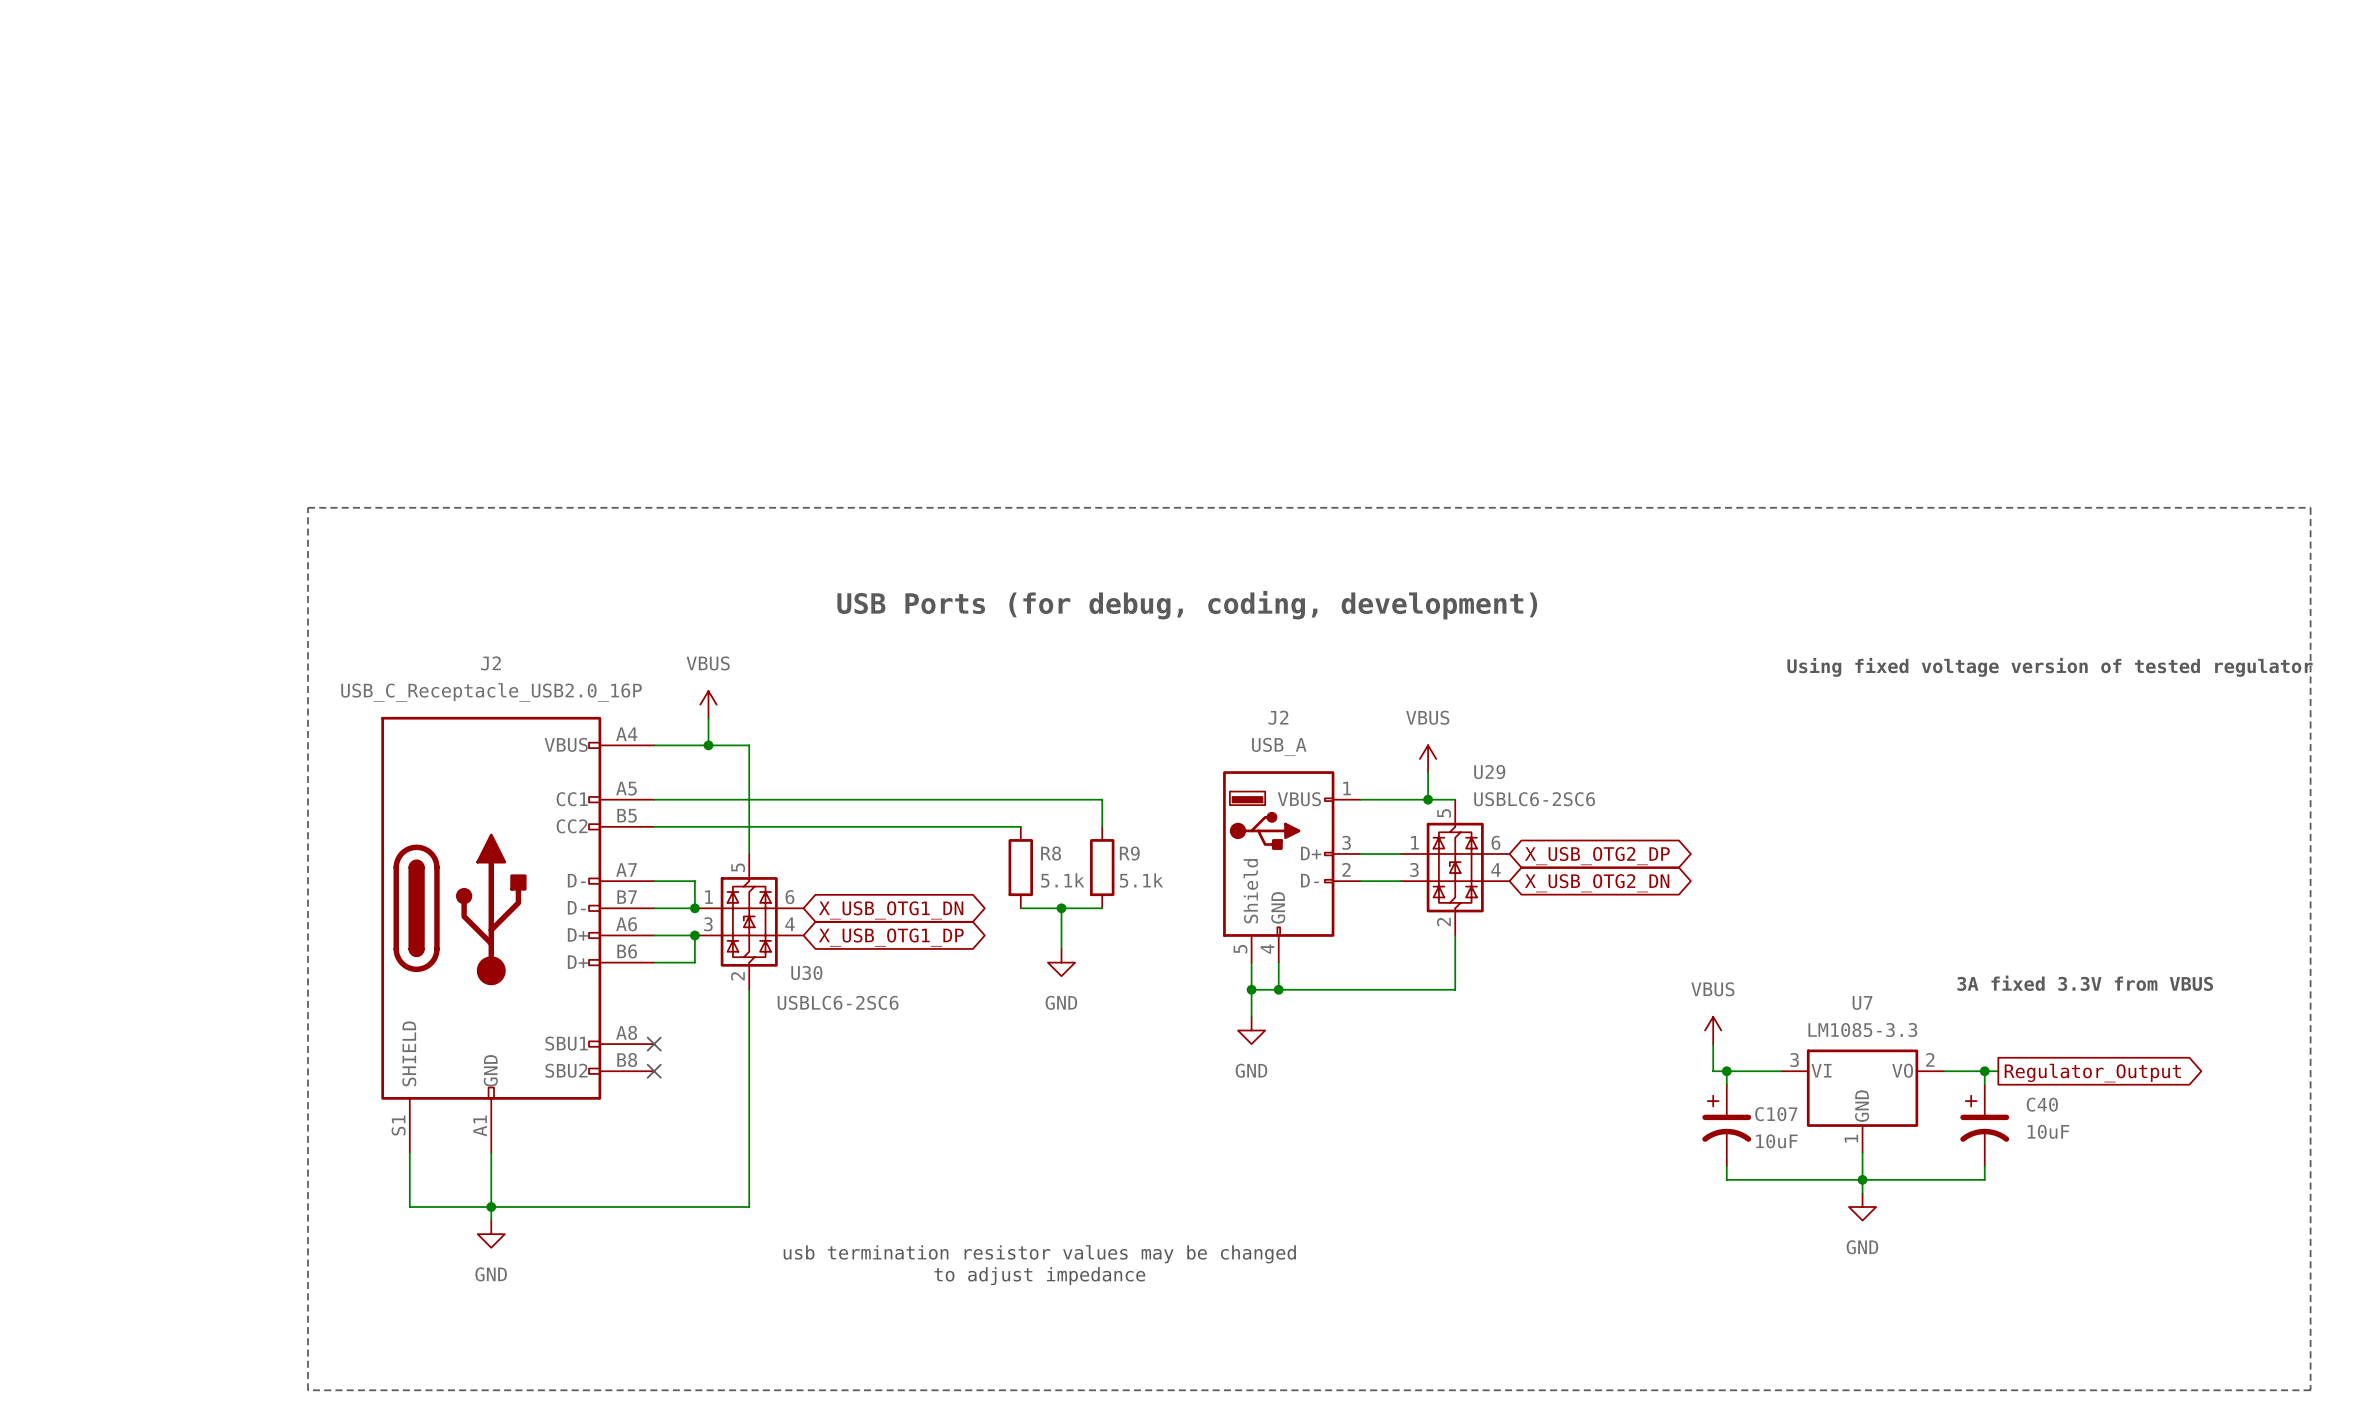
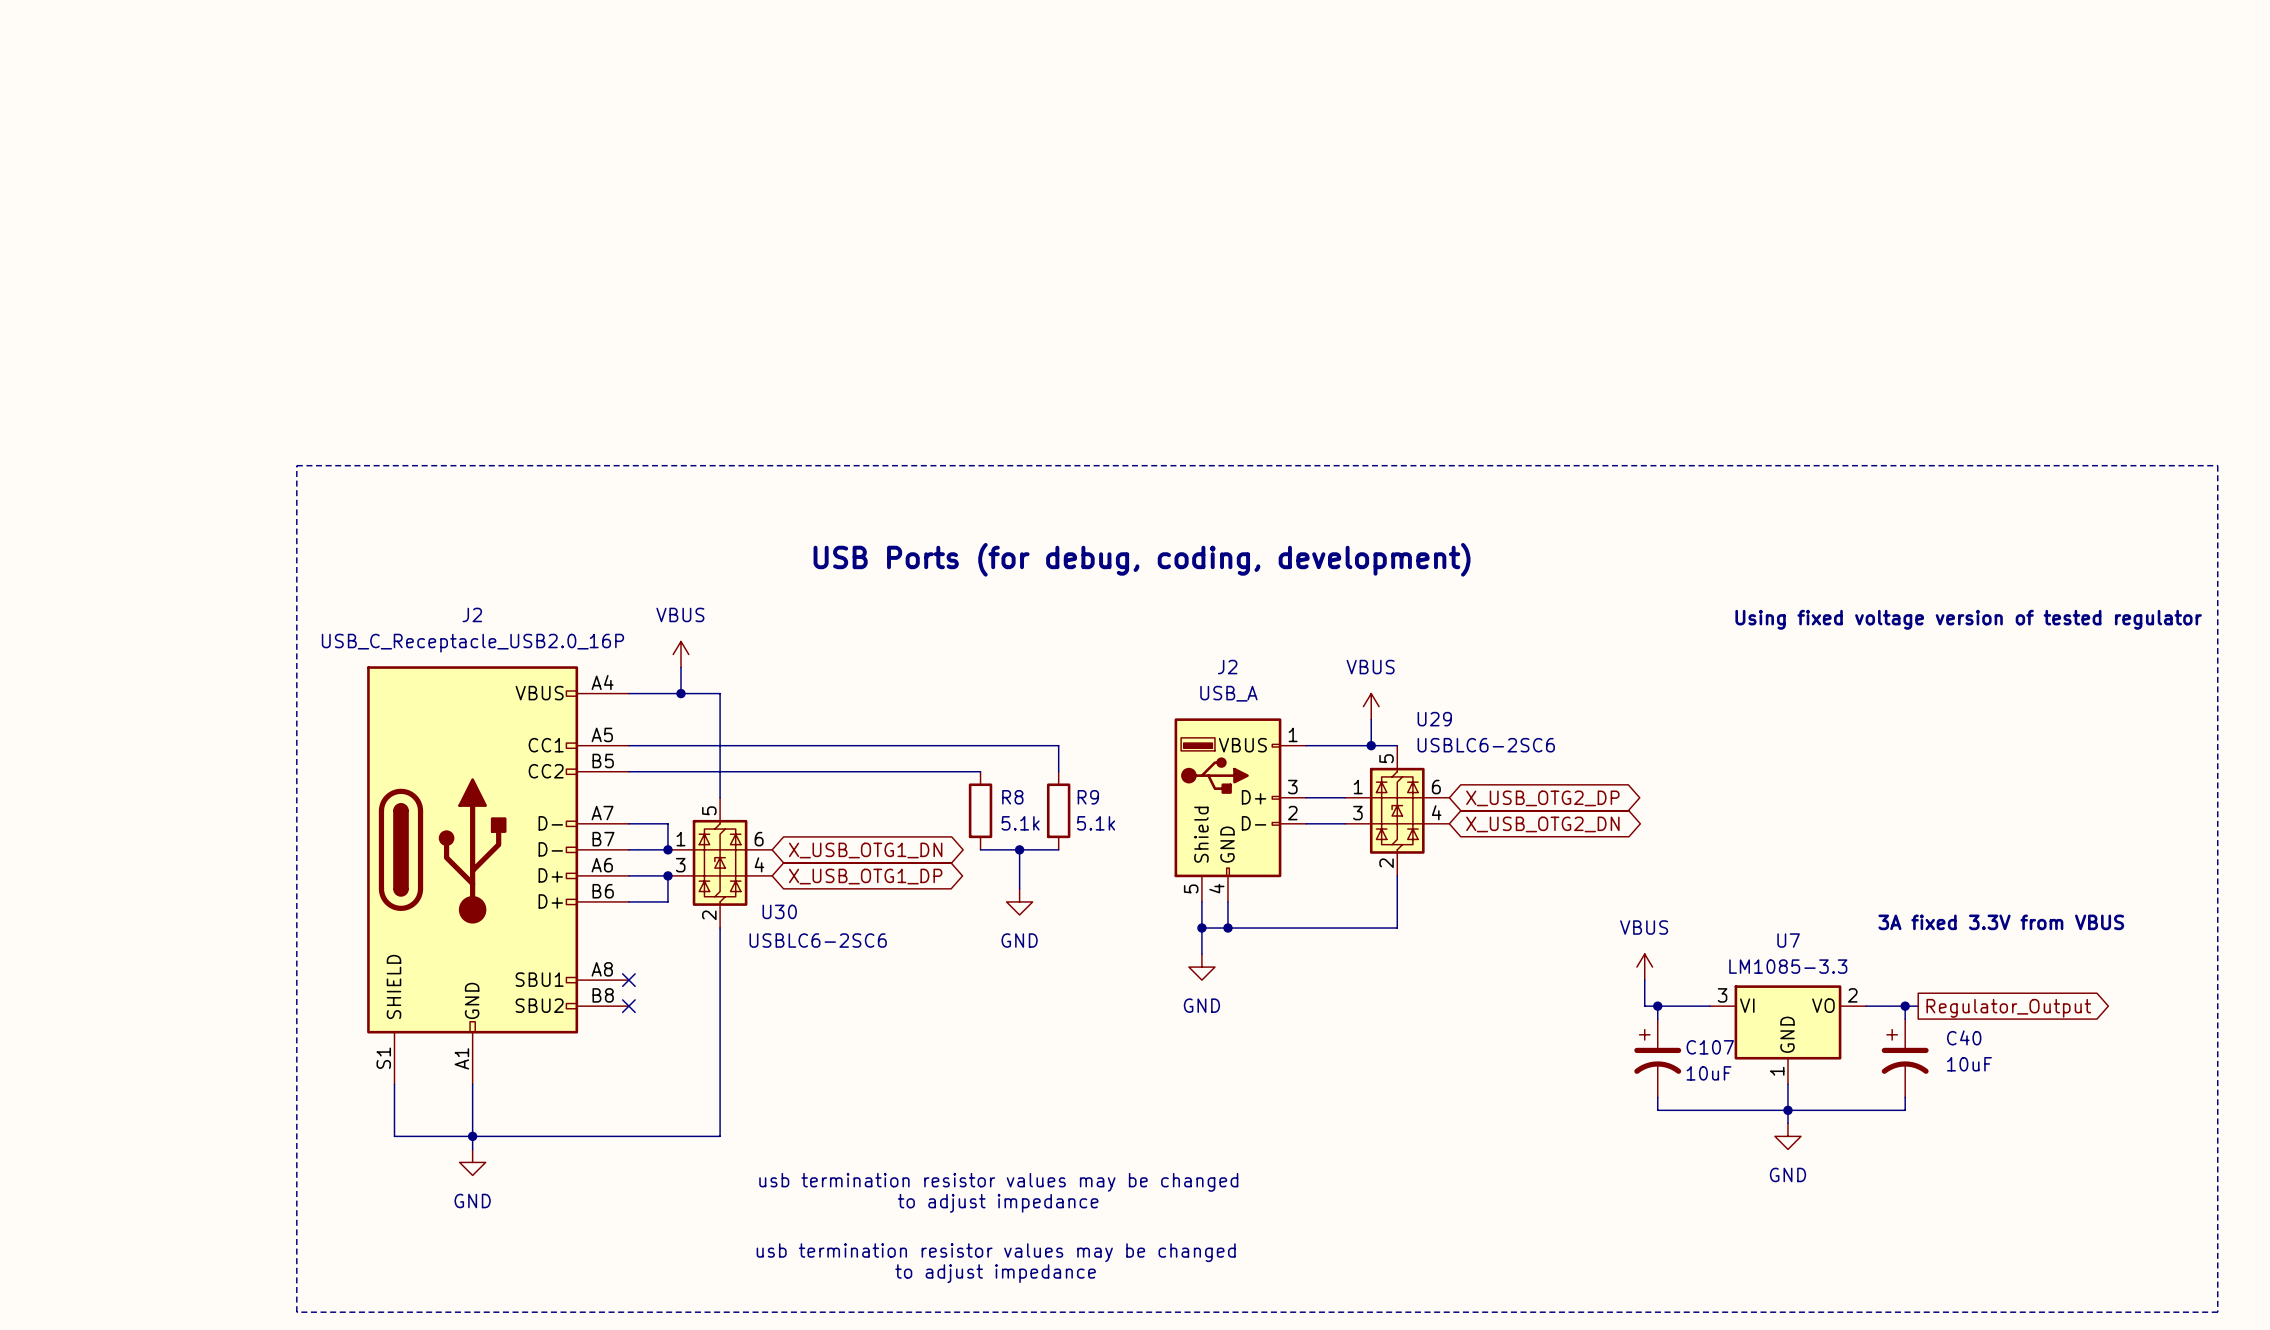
text: none -> usb termination resistor values may be changed (996, 1252)
text: none -> to adjust impedance (995, 1273)

